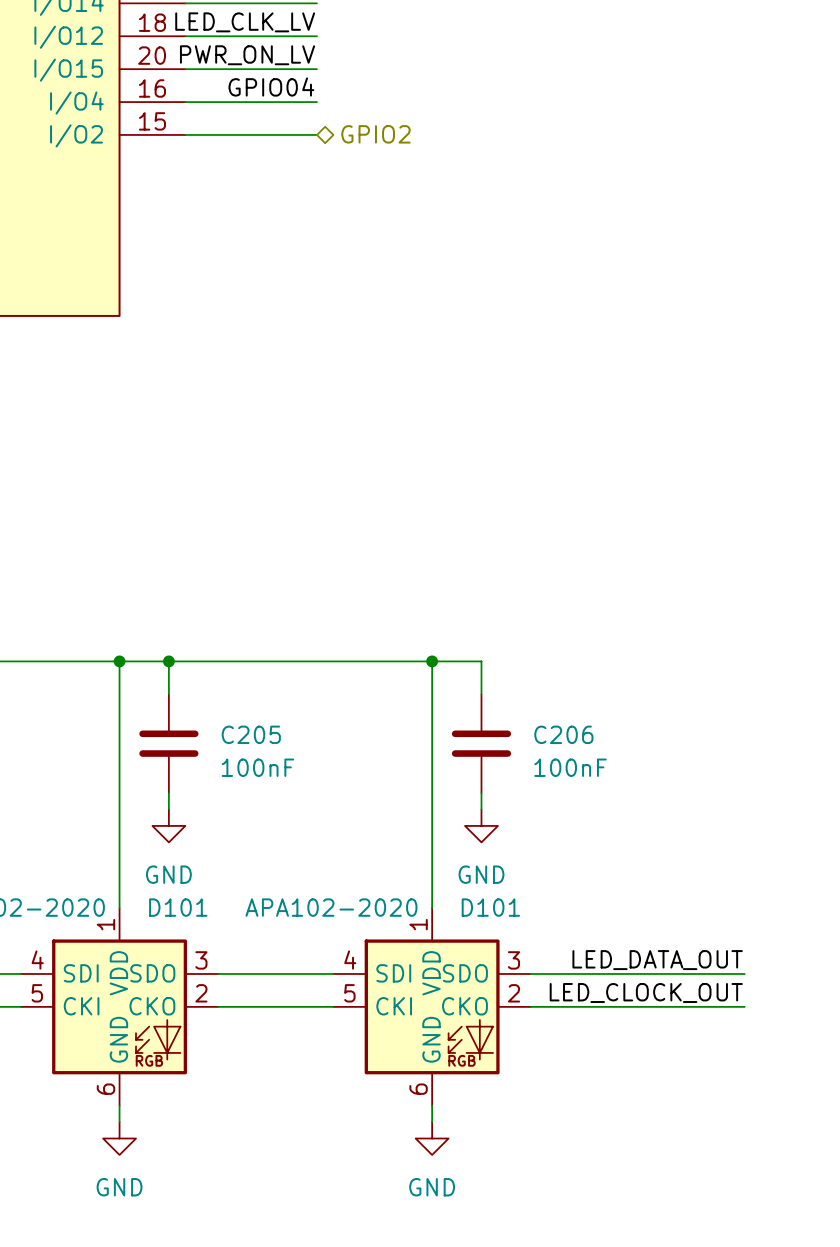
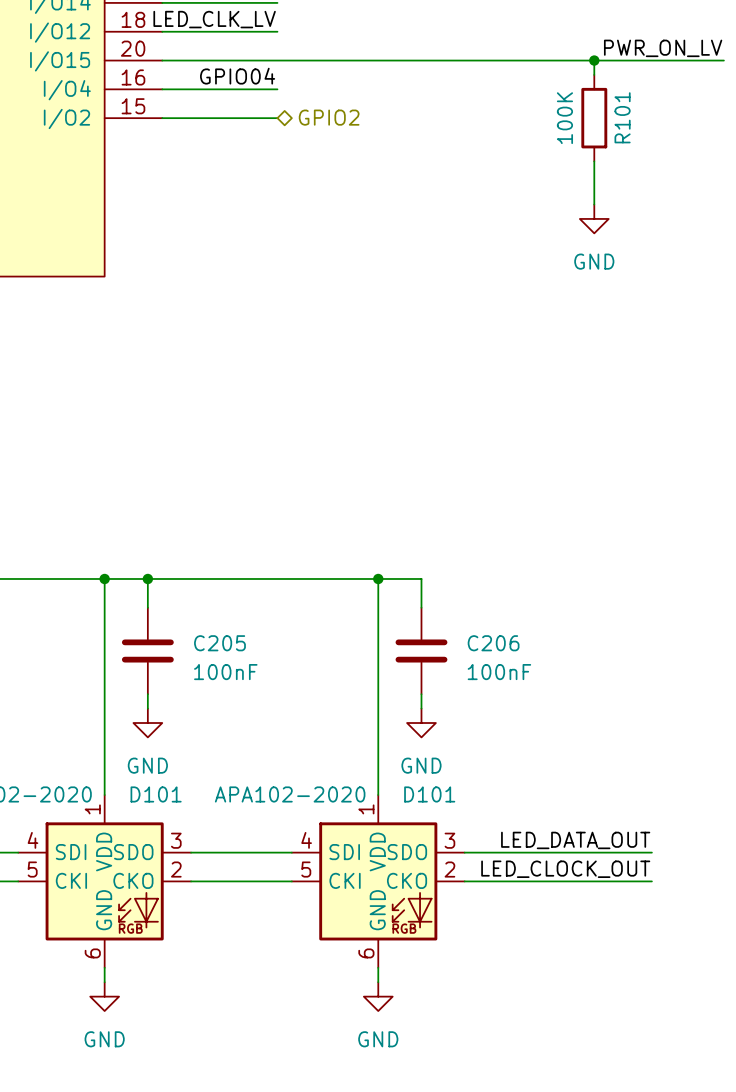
label: PWR_ON_LV (247, 55) -> none
label: none -> PWR_ON_LV (663, 48)
wire: none -> (277, 60) (723, 60)
wire: none -> (594, 60) (594, 74)
junction: none -> (594, 60)
R101: none -> 100K (594, 118)
wire: none -> (594, 161) (594, 204)
power symbol: none -> GND (594, 218)

